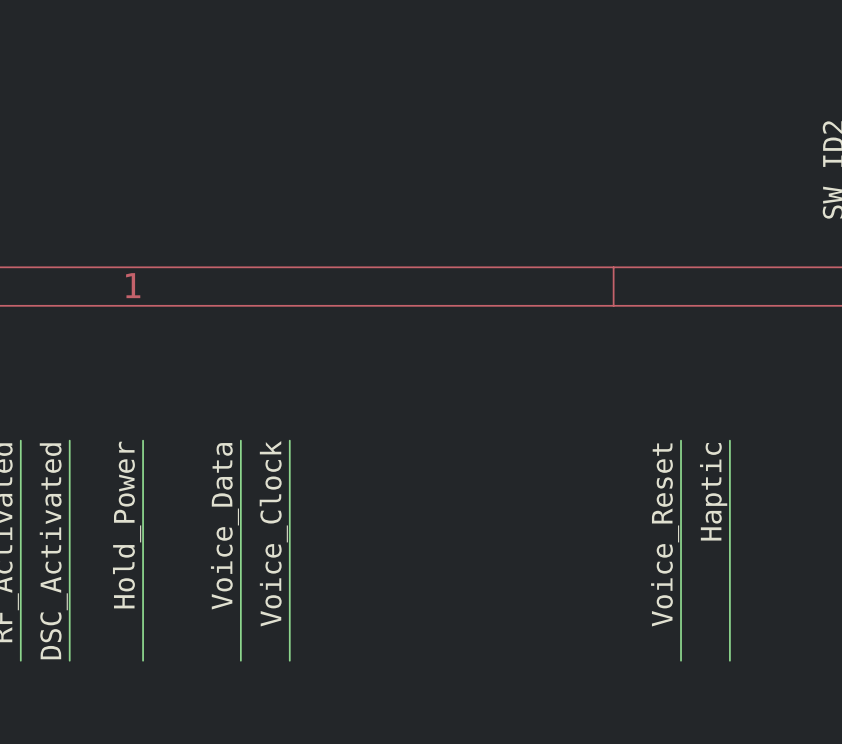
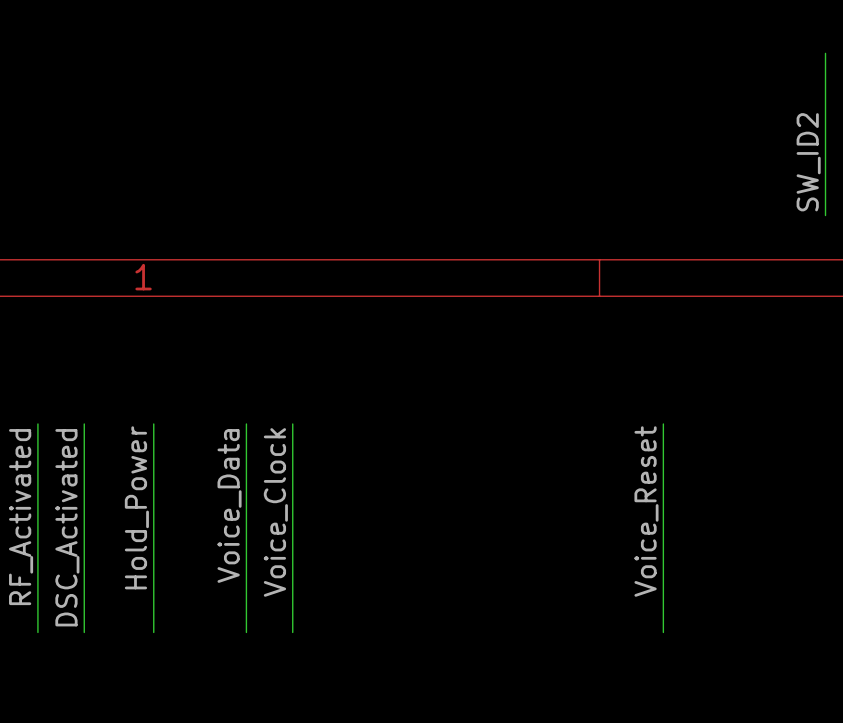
wire: (729, 440) (729, 660) -> none
label: Haptic (713, 491) -> none

